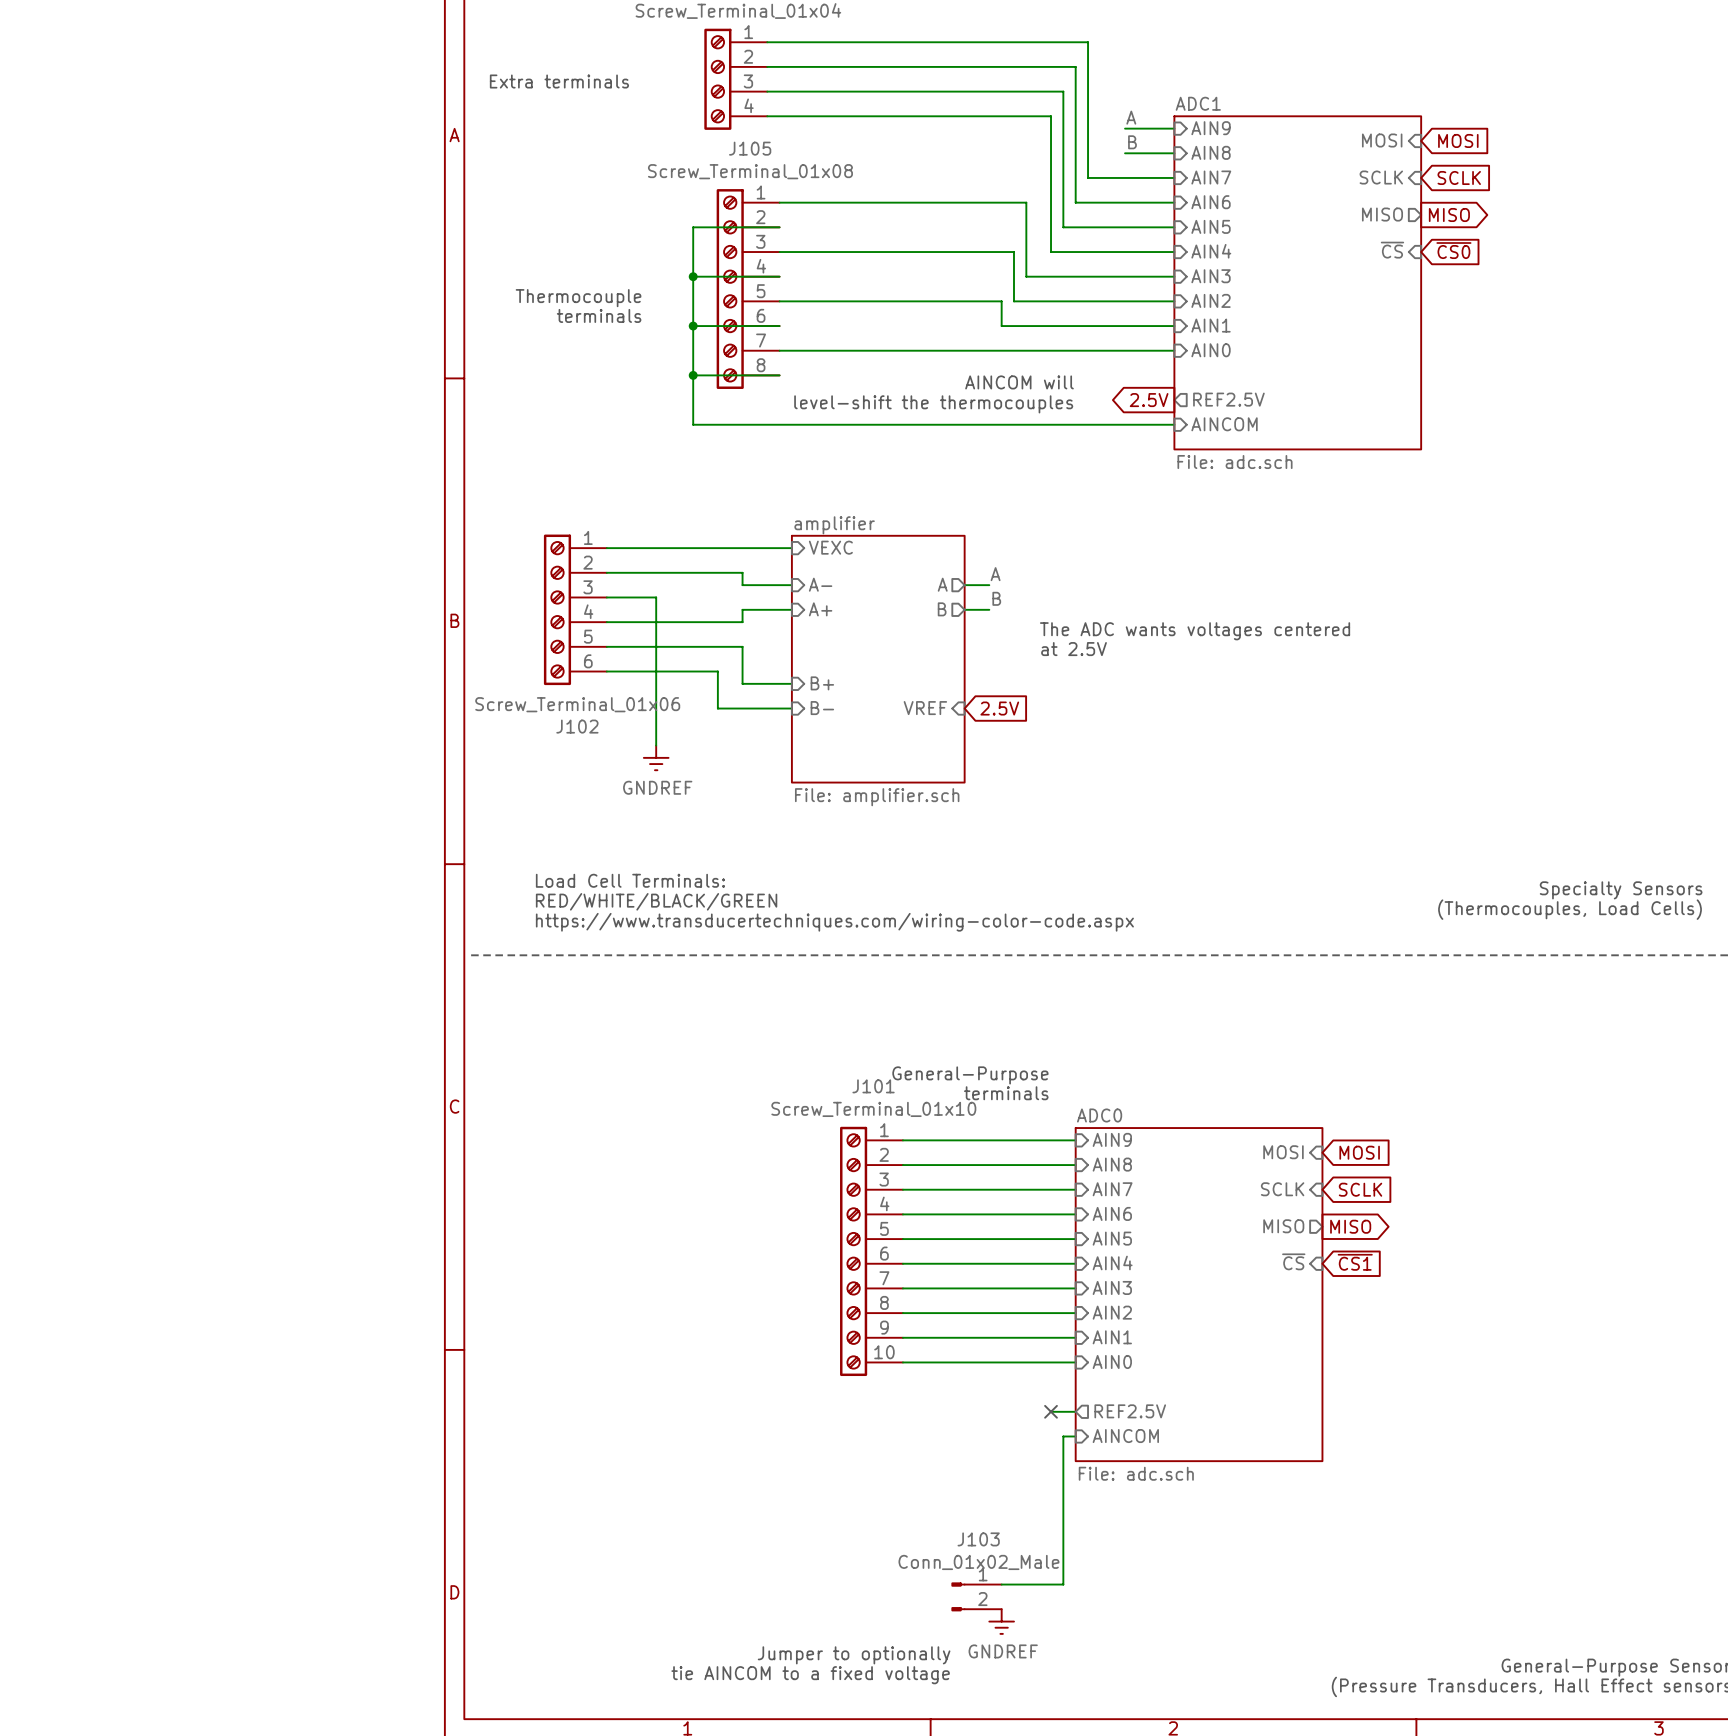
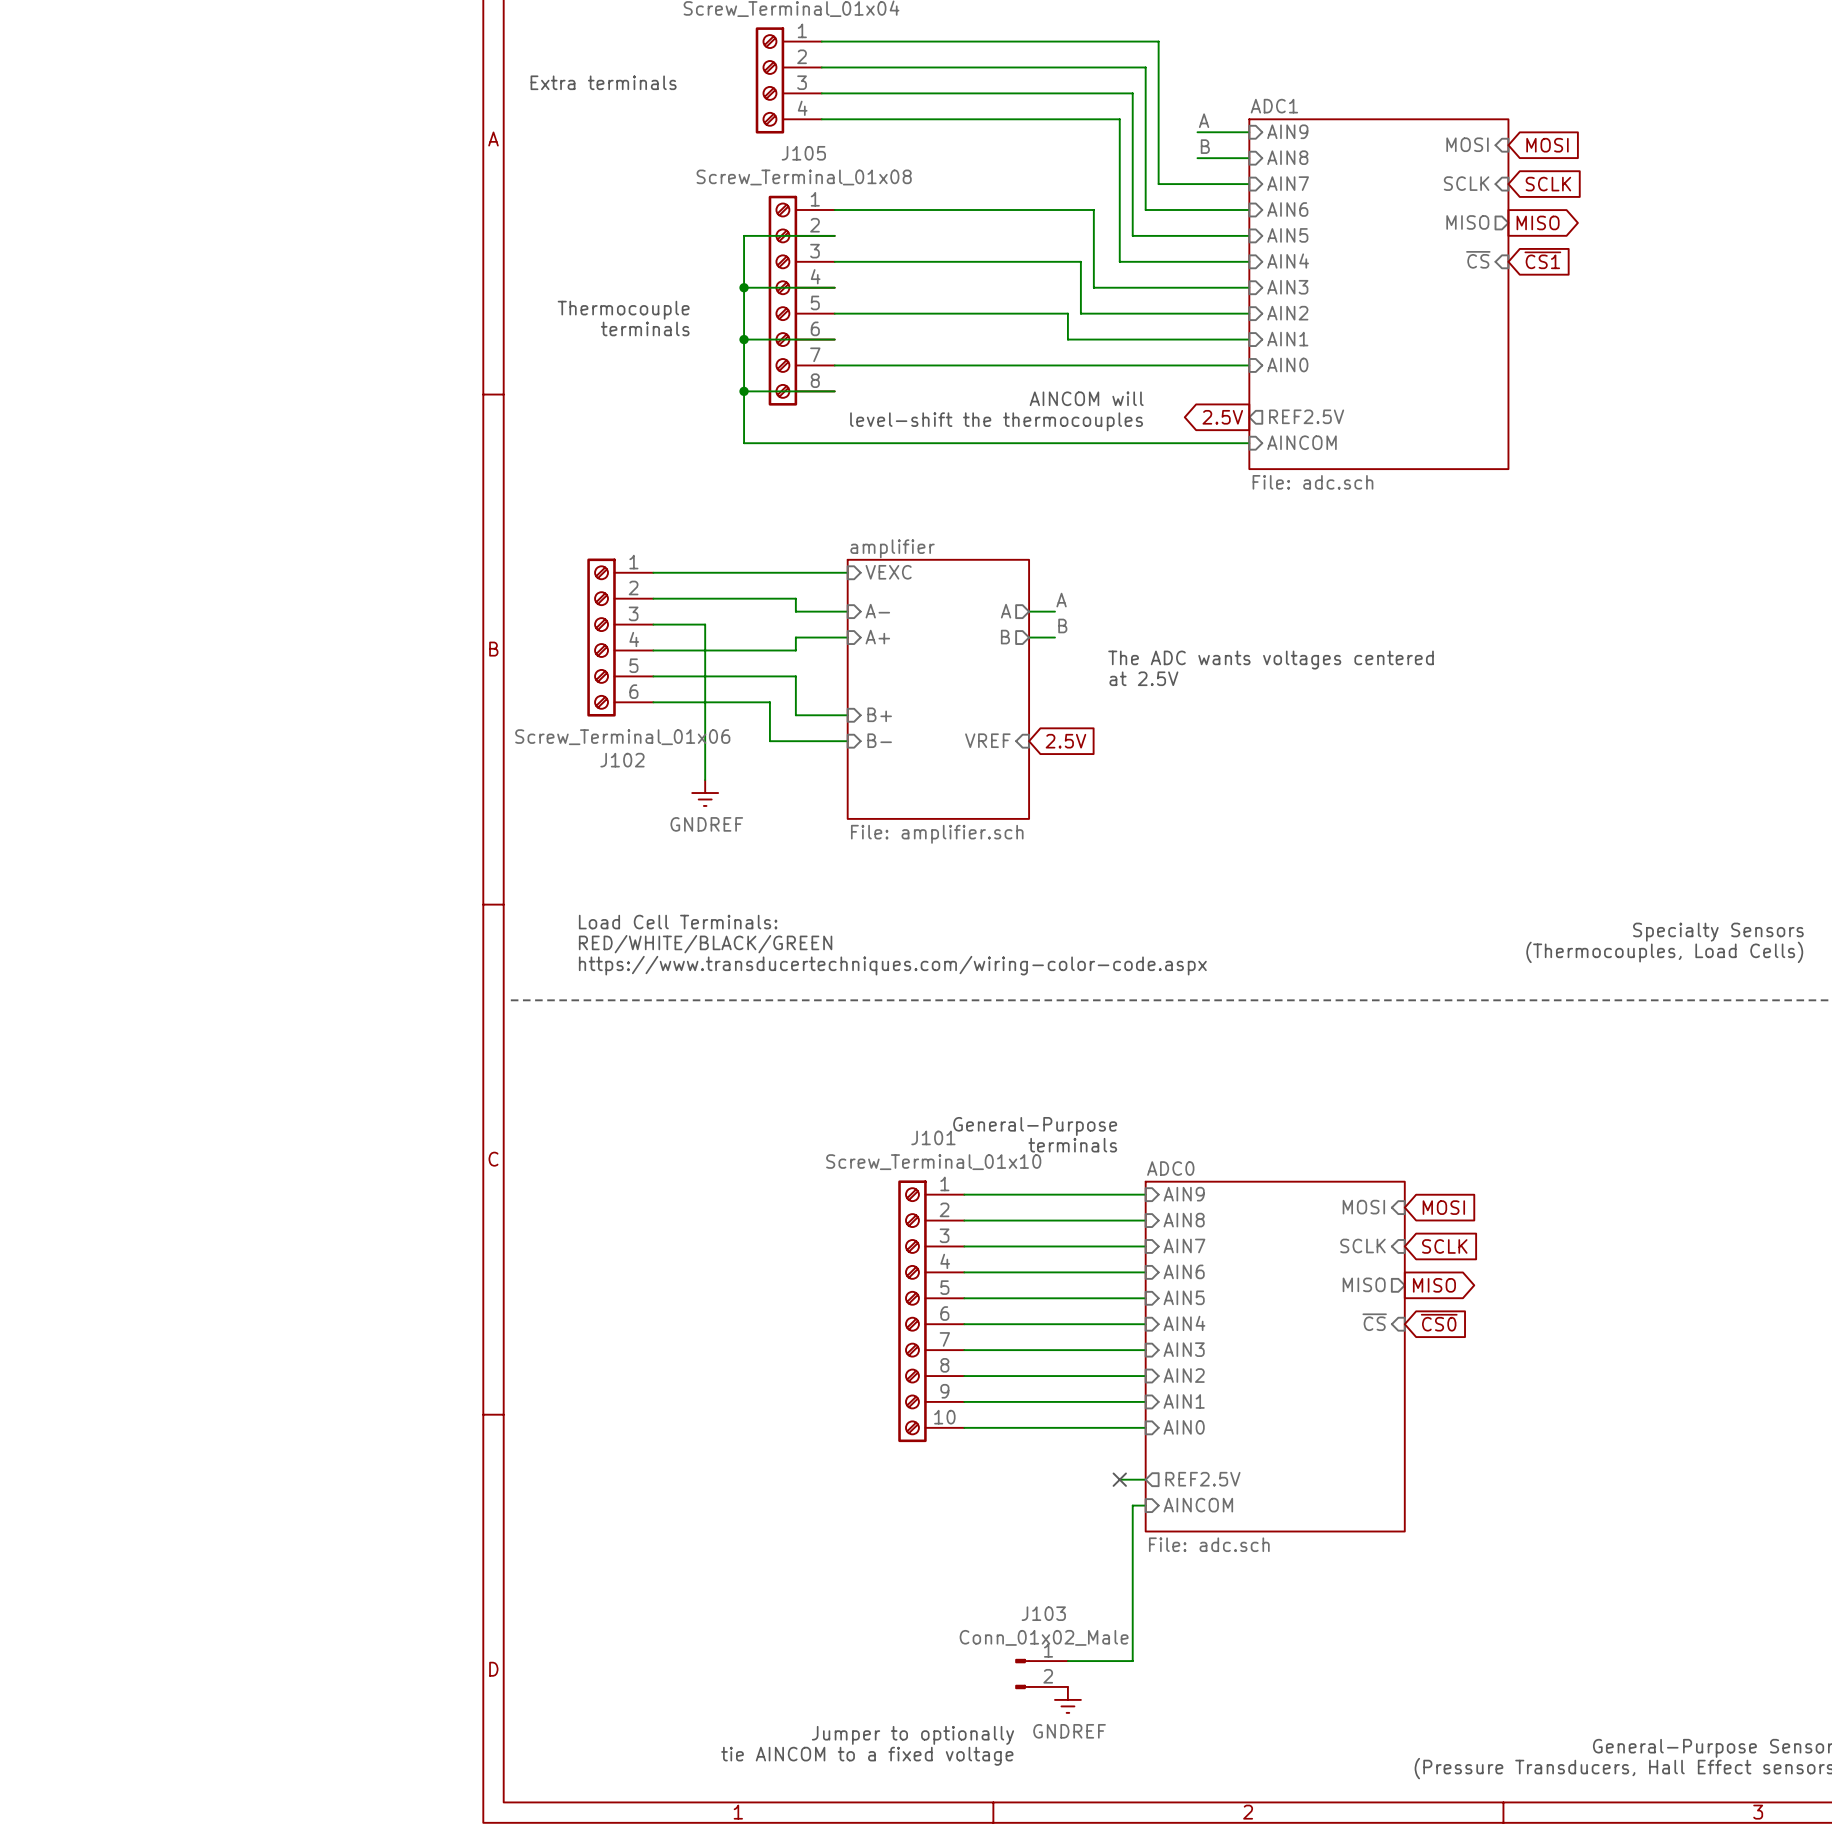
global label: ~{CS0} (1453, 250) -> ~{CS1} (1542, 260)
global label: ~{CS1} (1355, 1262) -> ~{CS0} (1439, 1322)

